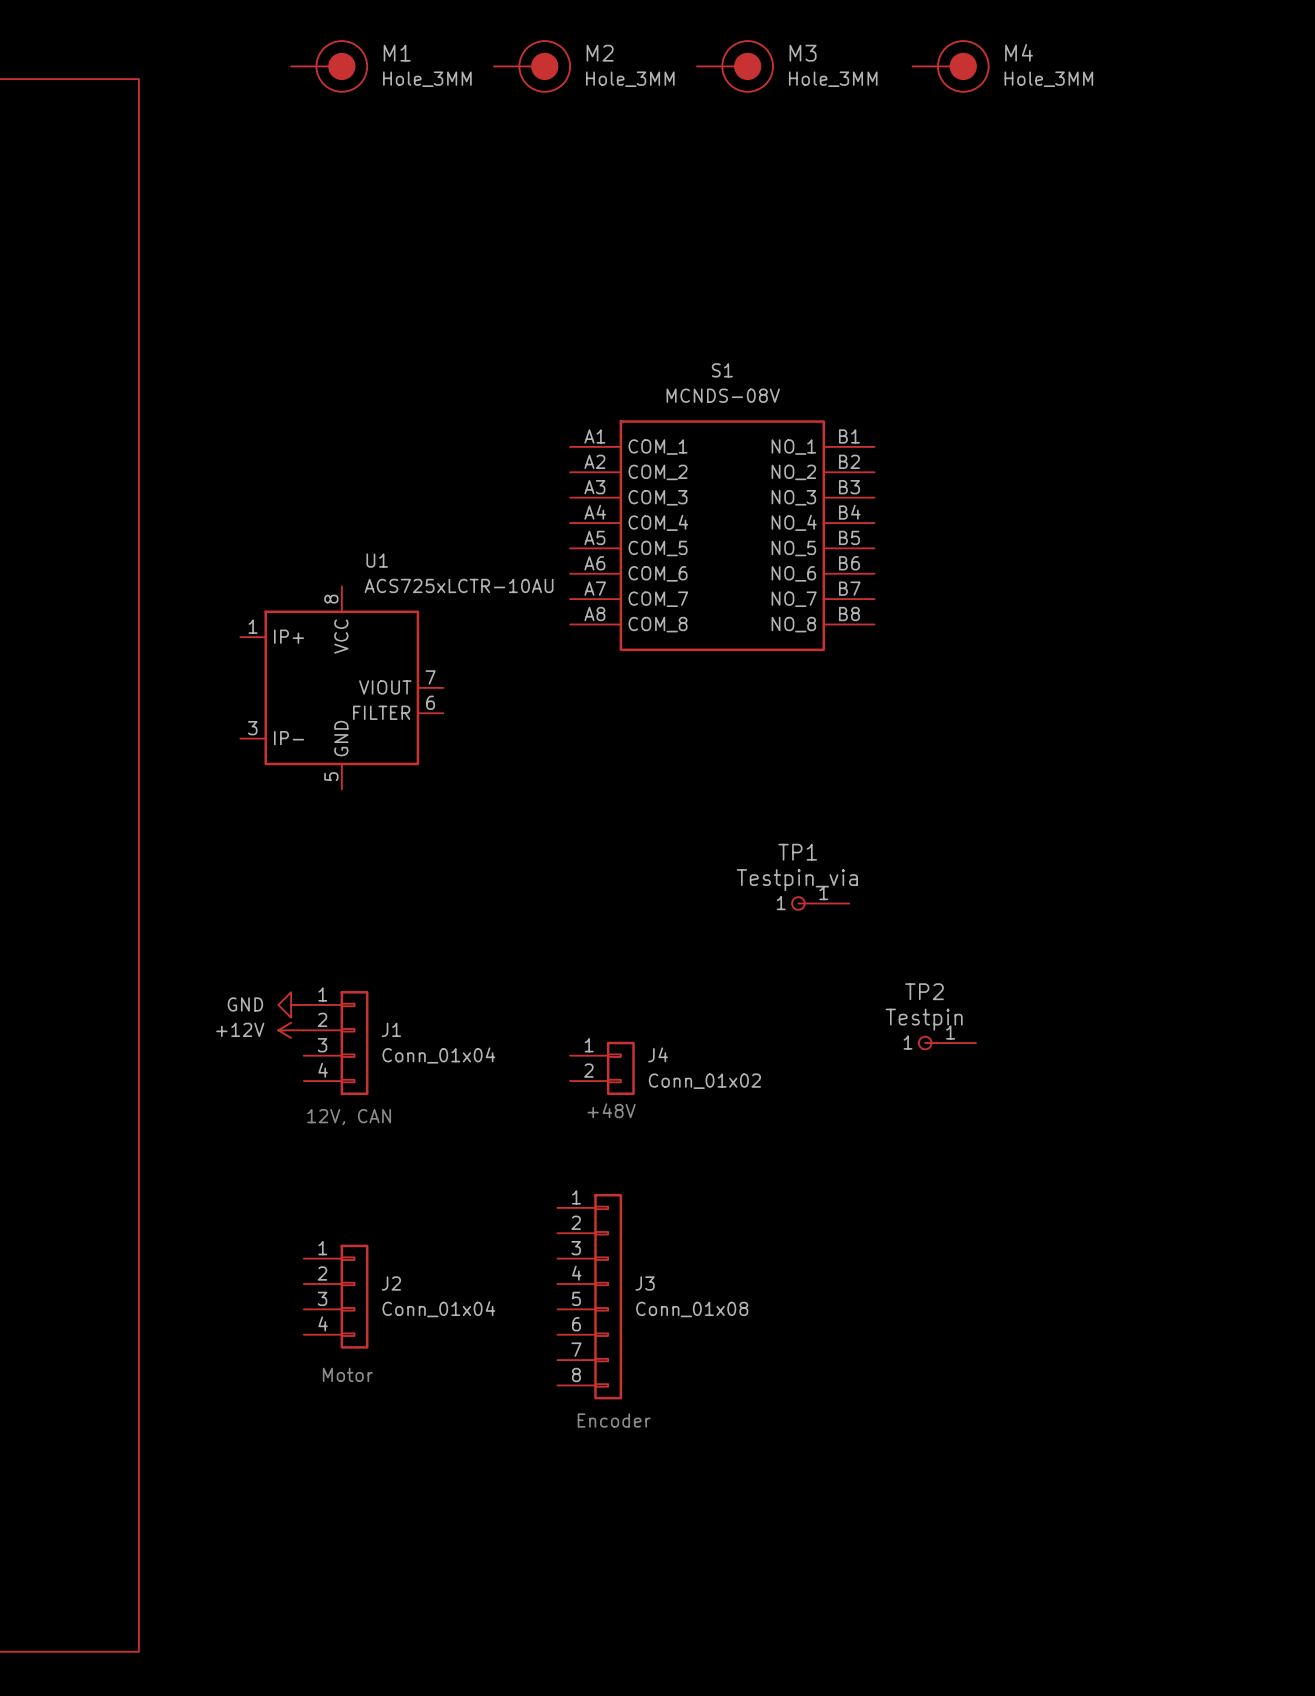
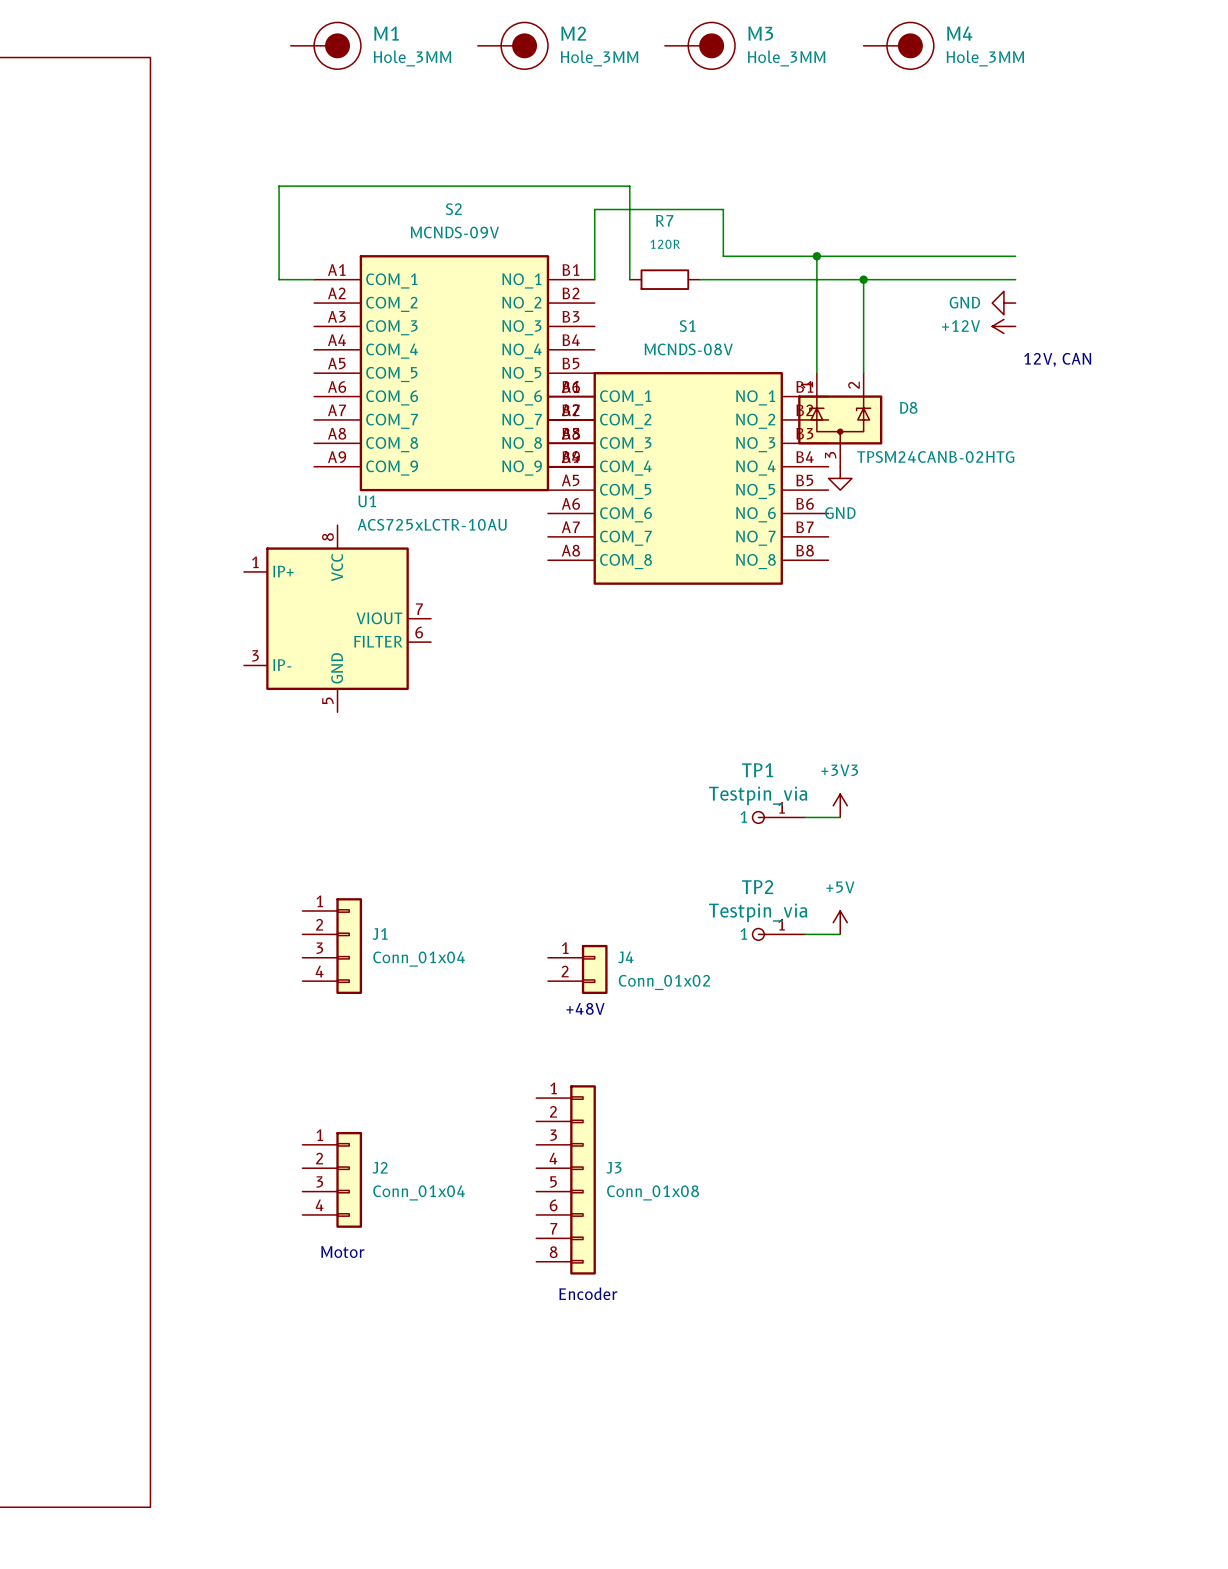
wire: none -> (816, 256) (816, 373)
junction: none -> (816, 256)
wire: none -> (1015, 256) (723, 256) (723, 209) (594, 209) (594, 279)
wire: none -> (314, 279) (279, 279) (279, 186) (629, 186) (629, 279)
R7: none -> (664, 279)
wire: none -> (699, 279) (1015, 279)
wire: none -> (863, 279) (863, 373)
junction: none -> (863, 279)
power symbol: none -> GND (1003, 303)
power symbol: none -> +12V (1003, 326)
text: none -> 12V, CAN (1057, 359)
S2: none -> MCNDS-09V (454, 373)
D8: none -> TPSM24CANB-02HTG (840, 419)
power symbol: none -> GND (840, 478)
power symbol: none -> +3V3 (840, 805)
wire: none -> (805, 817) (840, 817)
power symbol: GND (291, 1004) -> none
power symbol: none -> +5V (840, 922)
TP2 value: Testpin (924, 1019) -> Testpin_via (758, 912)
power symbol: +12V (291, 1030) -> none
wire: none -> (805, 934) (840, 934)
TP2 position: (947, 1043) -> (778, 934)
text: 12V, CAN (349, 1117) -> none

